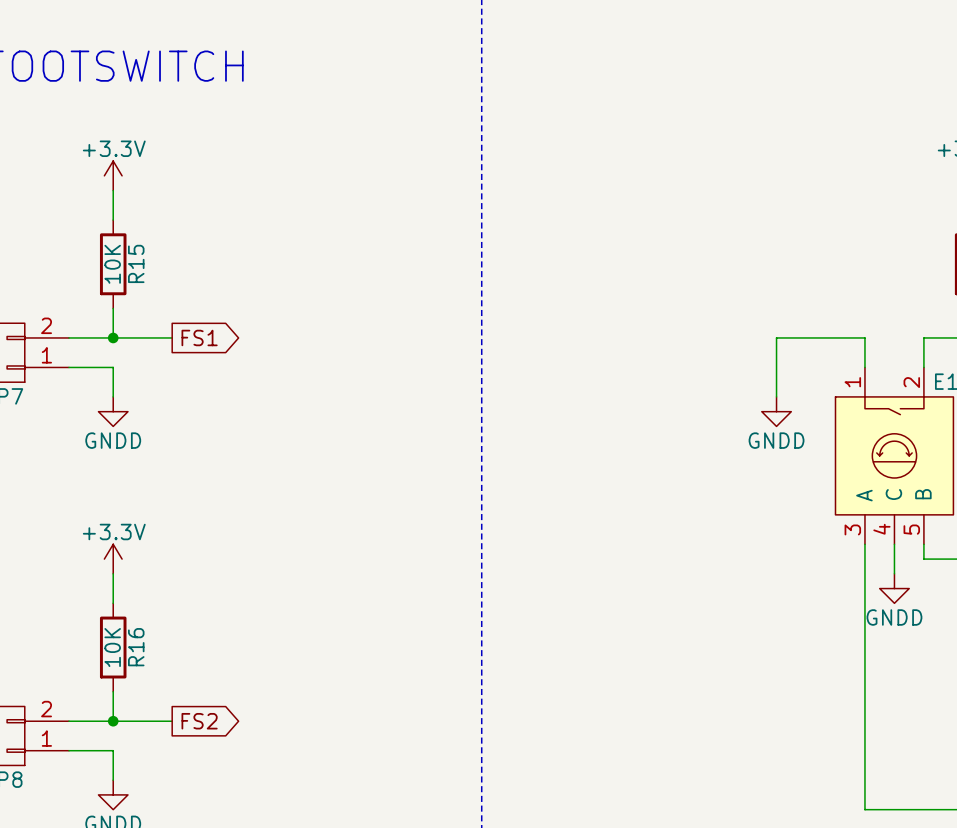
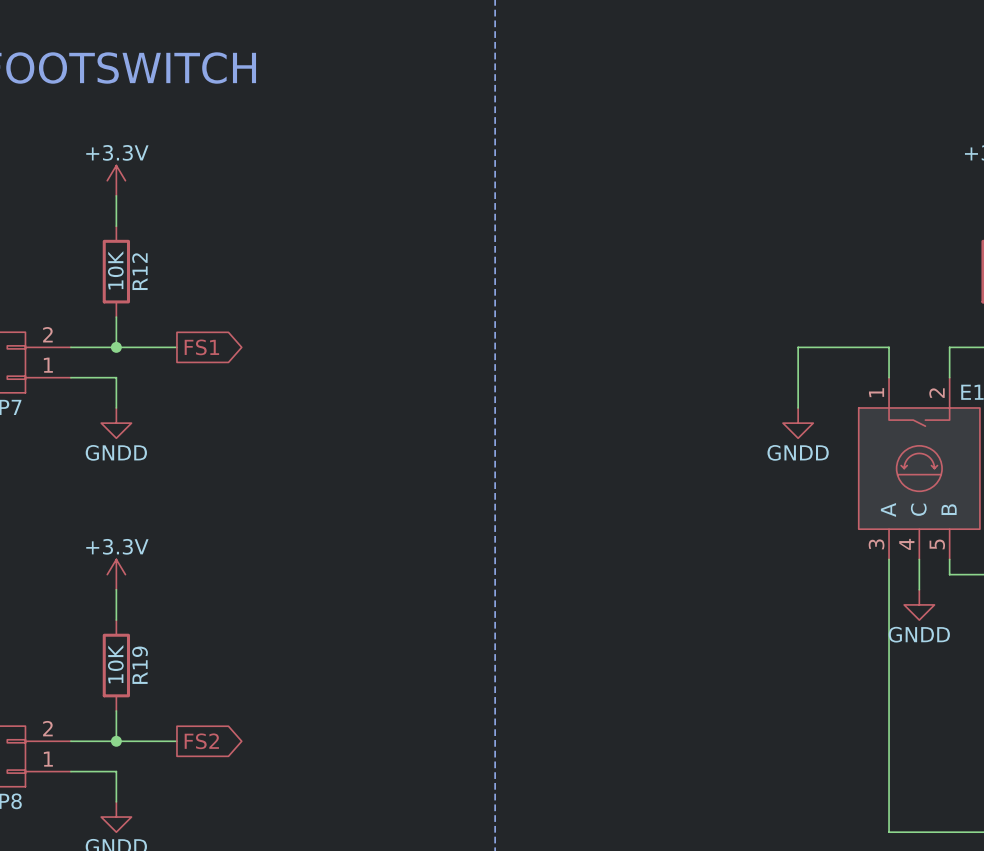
R15 name: R15 (136, 263) -> R12 (139, 271)
R16 name: R16 (136, 647) -> R19 (140, 665)

